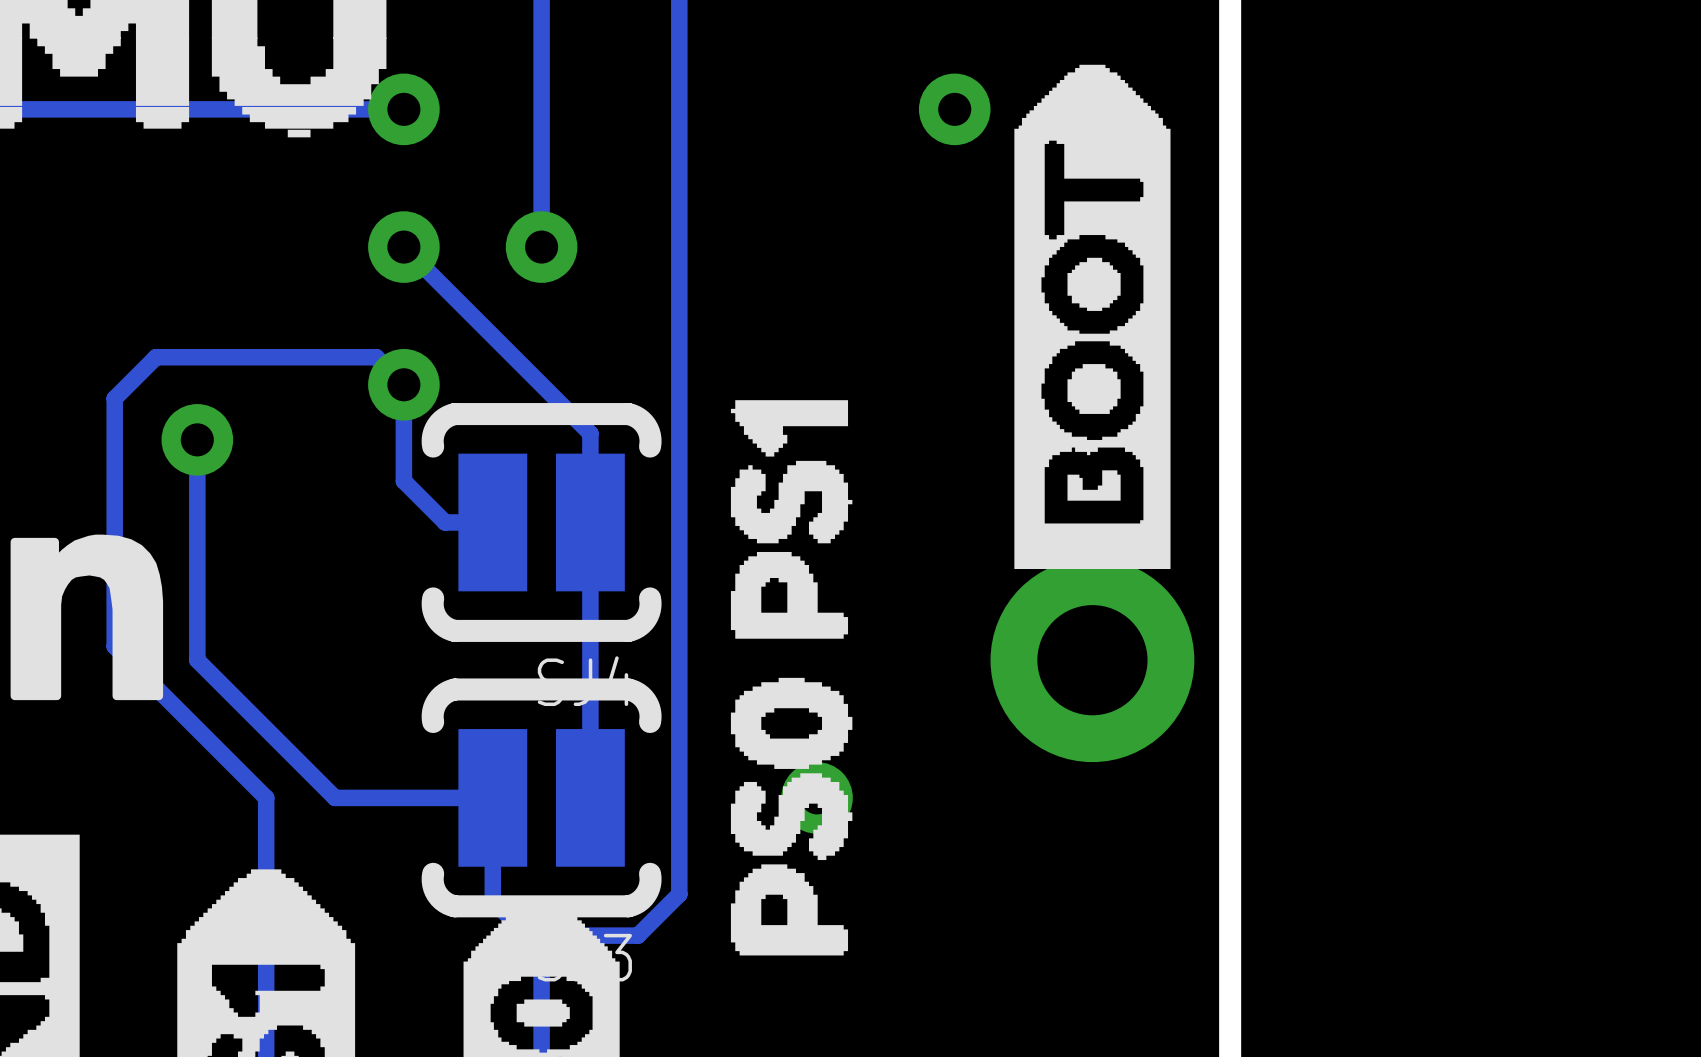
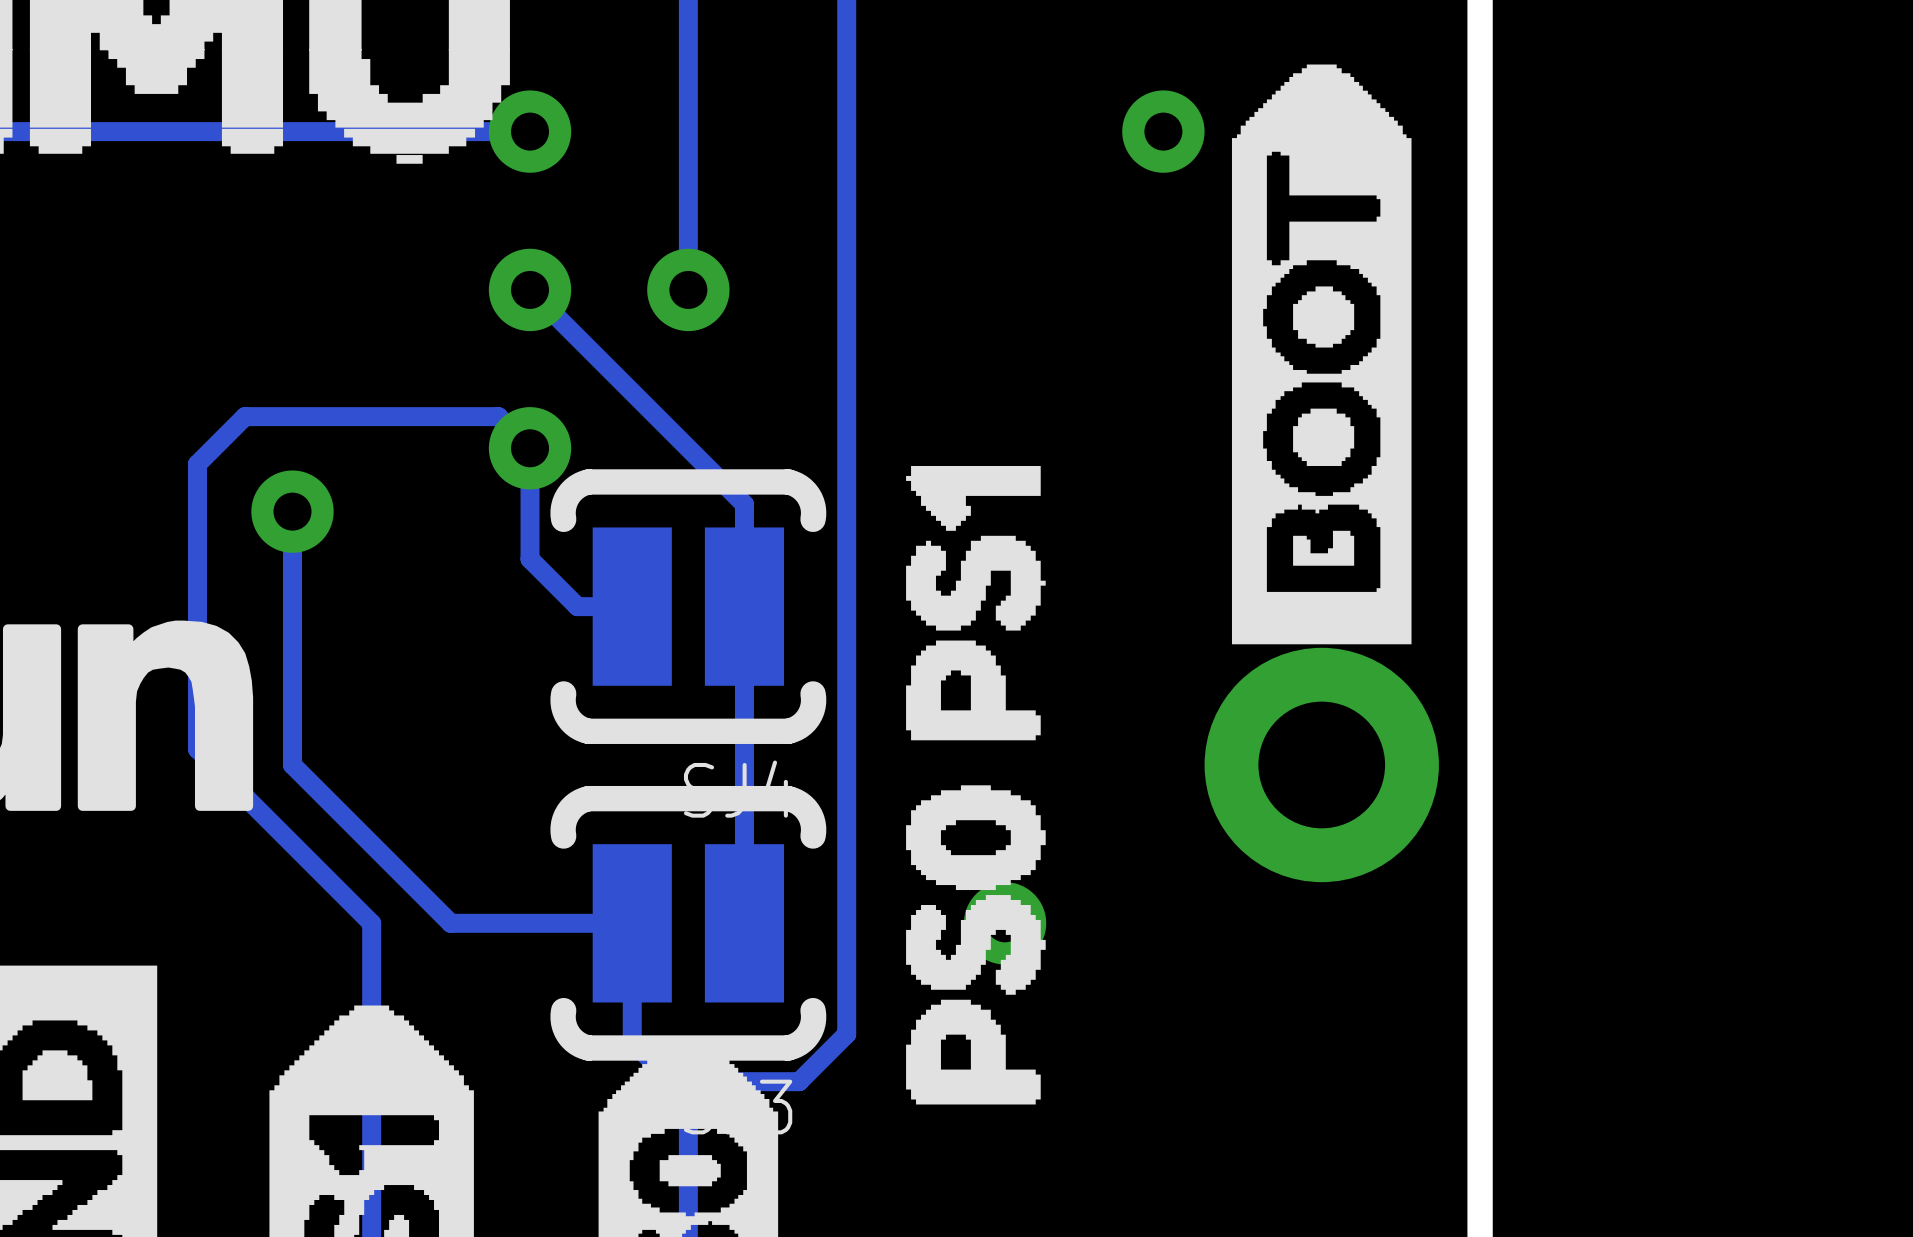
drawing position: (1092, 316) -> (1321, 354)

